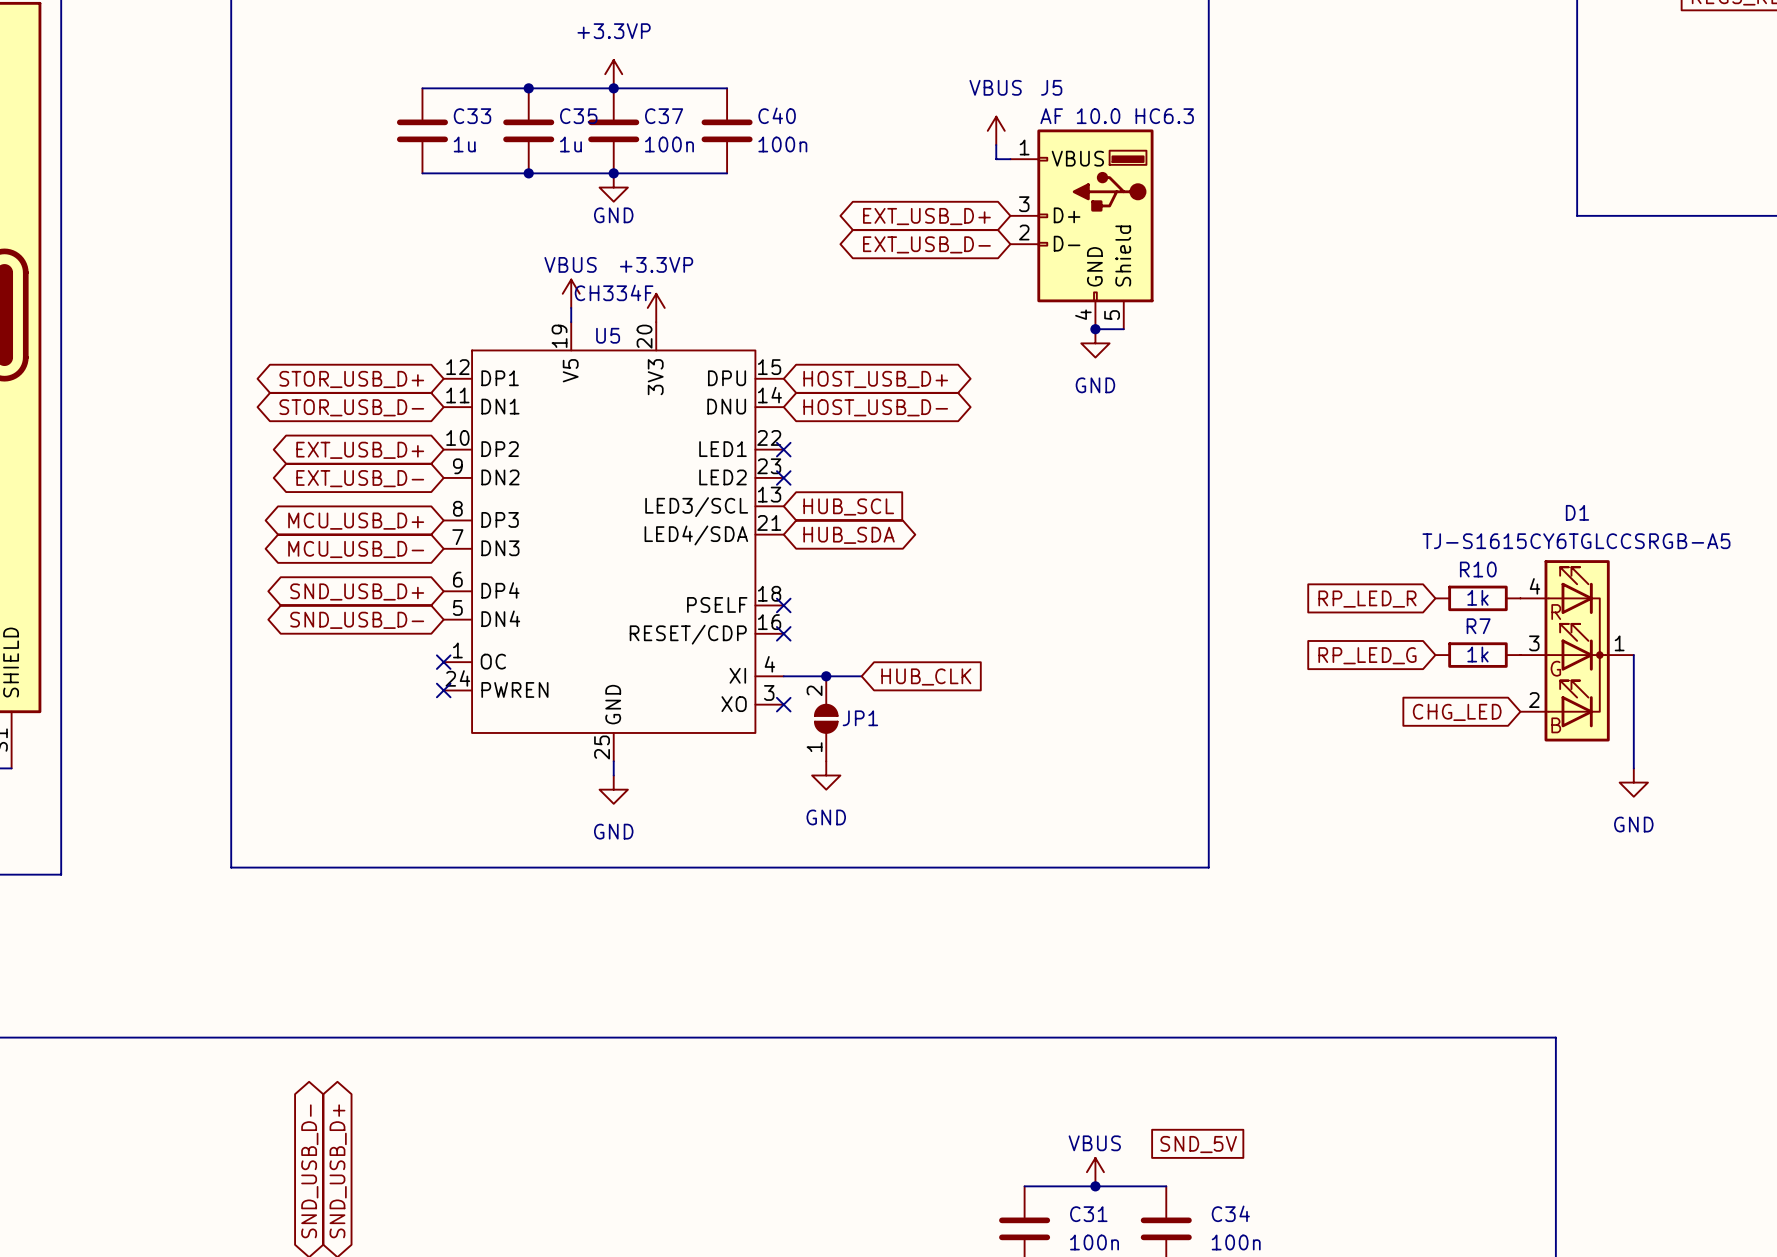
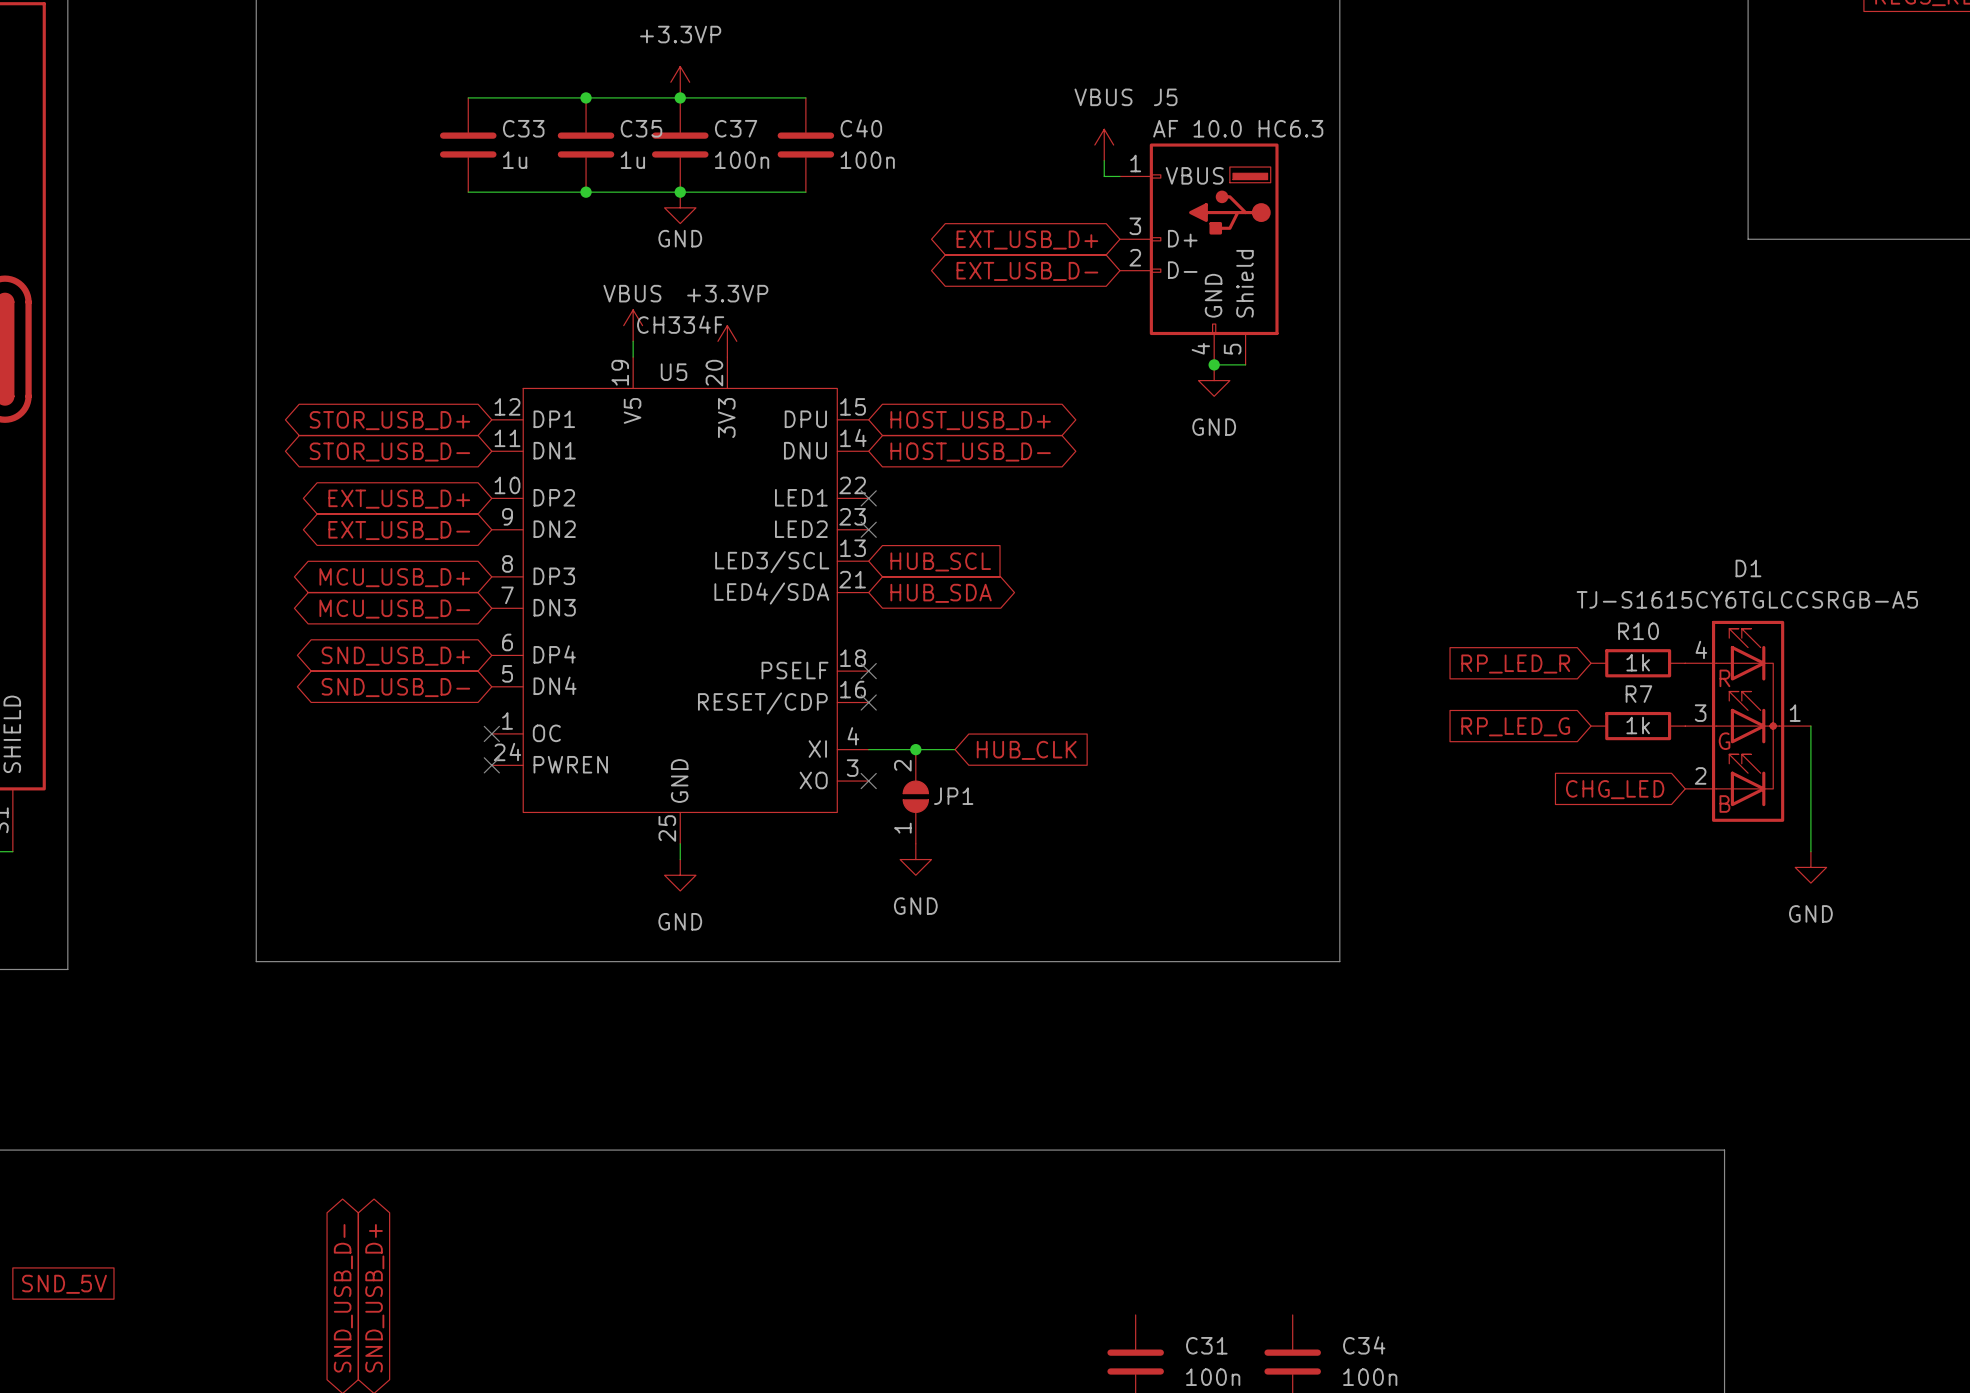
global label: SND_5V (1198, 1144) -> none
global label: none -> SND_5V (64, 1284)
power symbol: VBUS (1095, 1172) -> none
wire: (1024, 1186) (1166, 1186) -> none
junction: (1095, 1186) -> none

